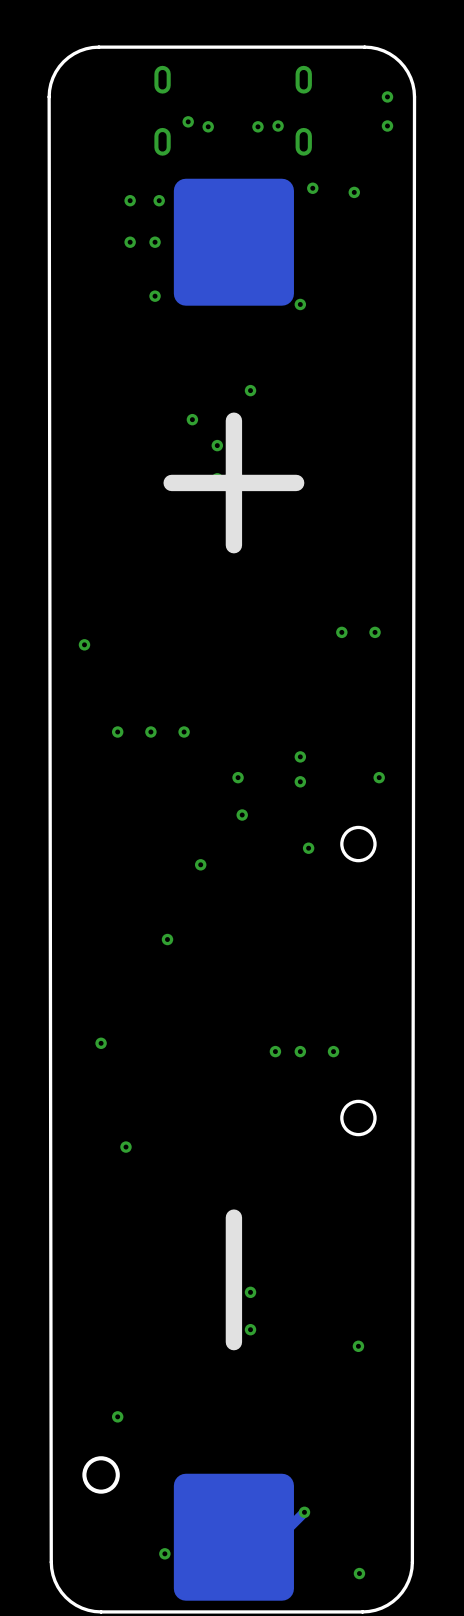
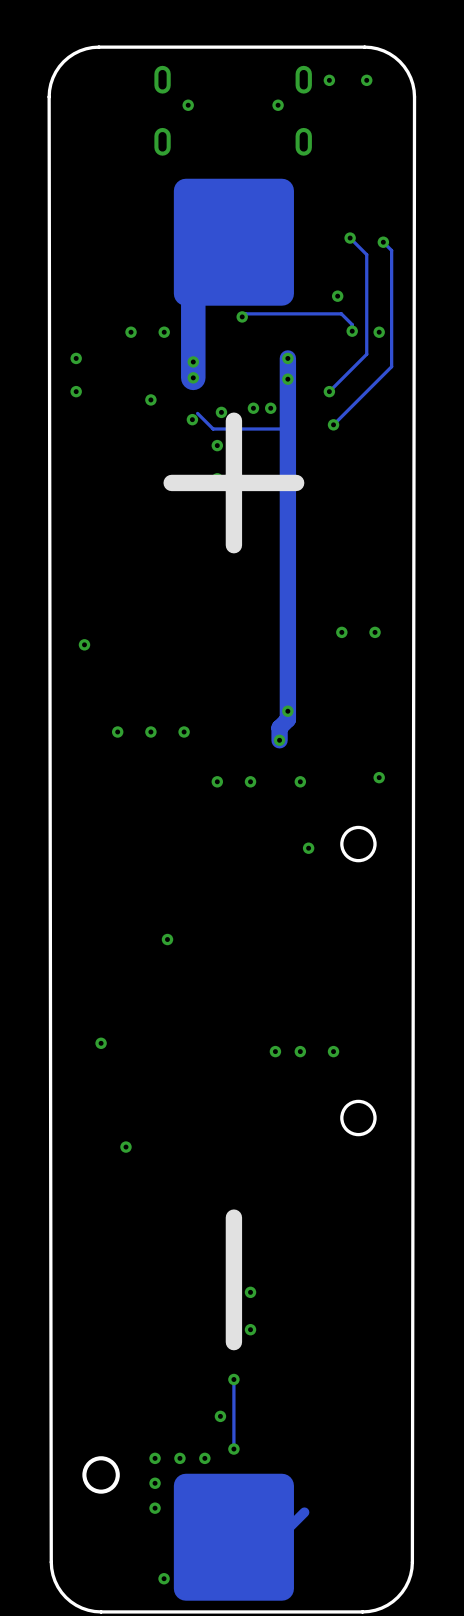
via: none -> (329, 80)
via: none -> (366, 80)
via: (387, 96) -> none
via: none -> (188, 105)
via: none -> (278, 105)
via: (188, 121) -> none
via: (278, 125) -> none
via: (387, 125) -> none
via: (208, 126) -> none
via: (257, 126) -> none
via: (312, 188) -> none
via: (354, 192) -> none
via: (130, 200) -> none
via: (159, 200) -> none
track: none -> (350, 238) (366, 254) (366, 354) (329, 391)
via: none -> (350, 238)
via: (130, 242) -> none
via: (155, 242) -> none
track: none -> (233, 242) (193, 282) (193, 377)
track: none -> (383, 242) (391, 250) (391, 366) (333, 424)
via: none -> (383, 242)
via: (155, 296) -> none
via: none -> (337, 296)
via: (300, 304) -> none
track: none -> (242, 316) (245, 313) (341, 313) (352, 324) (352, 331)
via: none -> (242, 316)
via: none -> (352, 331)
via: none -> (131, 332)
via: none -> (164, 332)
via: none -> (379, 332)
via: none -> (76, 358)
track: none -> (287, 358) (287, 719) (279, 727) (279, 740)
via: none -> (287, 358)
via: none -> (193, 361)
via: none -> (193, 377)
via: none -> (287, 379)
via: (250, 390) -> none
via: none -> (76, 391)
via: none -> (329, 391)
via: none -> (150, 399)
via: none -> (253, 408)
via: none -> (270, 408)
via: none -> (221, 412)
track: none -> (197, 413) (213, 428) (287, 428)
via: none -> (333, 424)
via: none -> (287, 711)
via: none -> (279, 740)
via: (300, 756) -> none
via: (238, 777) -> none
via: none -> (217, 781)
via: none -> (250, 781)
via: (242, 815) -> none
via: (200, 864) -> none
via: (358, 1346) -> none
track: none -> (233, 1379) (233, 1449)
via: none -> (233, 1379)
via: (117, 1416) -> none
via: none -> (220, 1416)
via: none -> (233, 1449)
via: none -> (155, 1458)
via: none -> (179, 1458)
via: none -> (204, 1458)
via: none -> (155, 1483)
via: none -> (155, 1508)
via: (304, 1512) -> none
via: (164, 1553) -> none
via: (359, 1573) -> none
via: none -> (164, 1578)

